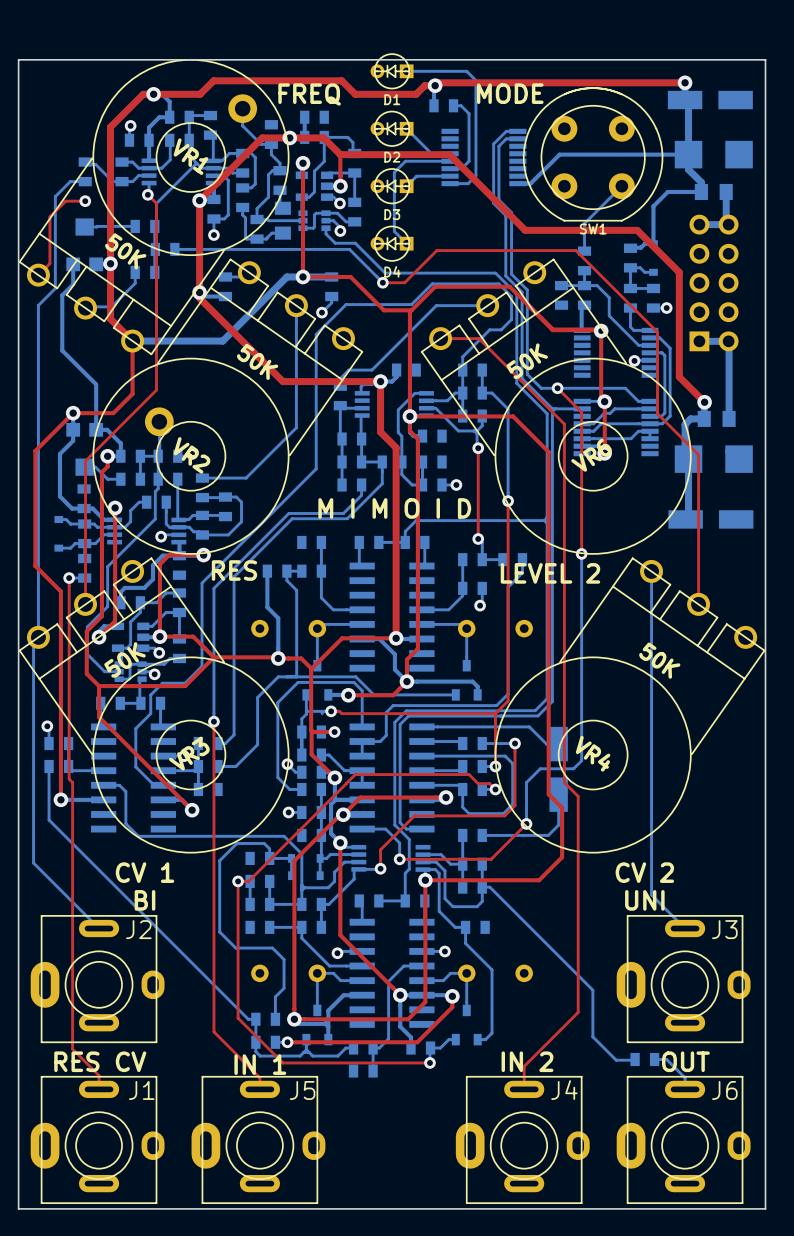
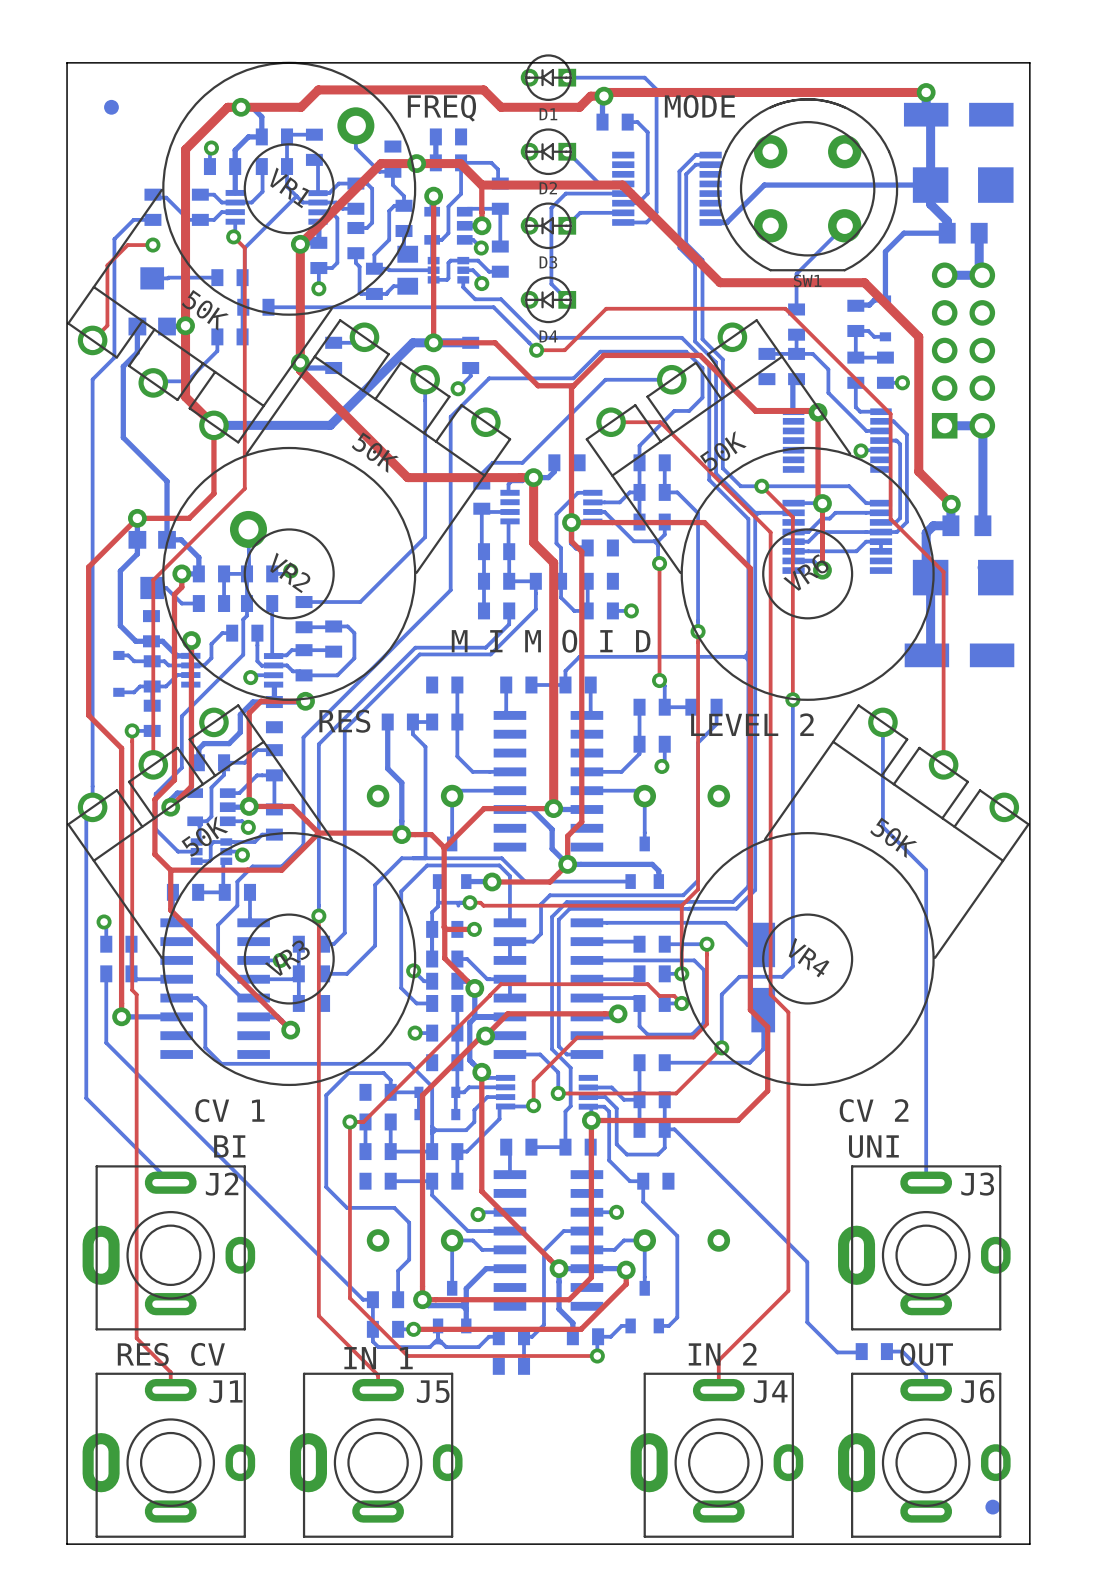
part: none -> (111, 107)
bottom track: (651, 652) (651, 894) (685, 928) -> (882, 826) (926, 870) (926, 1182)
part: none -> (992, 1507)

